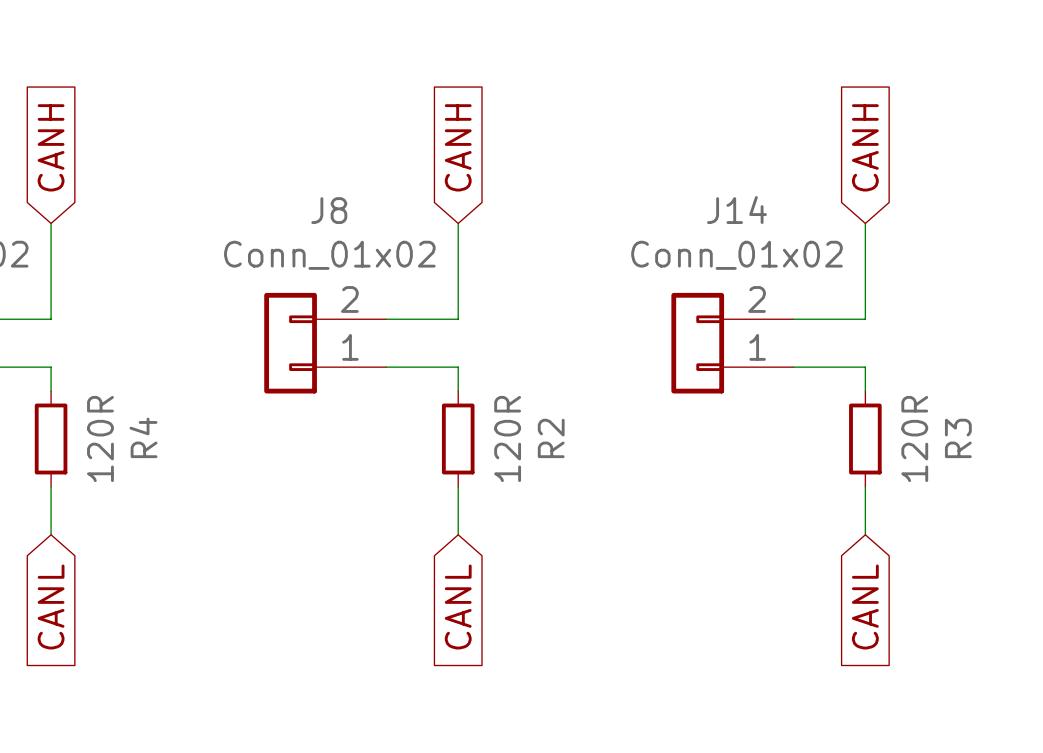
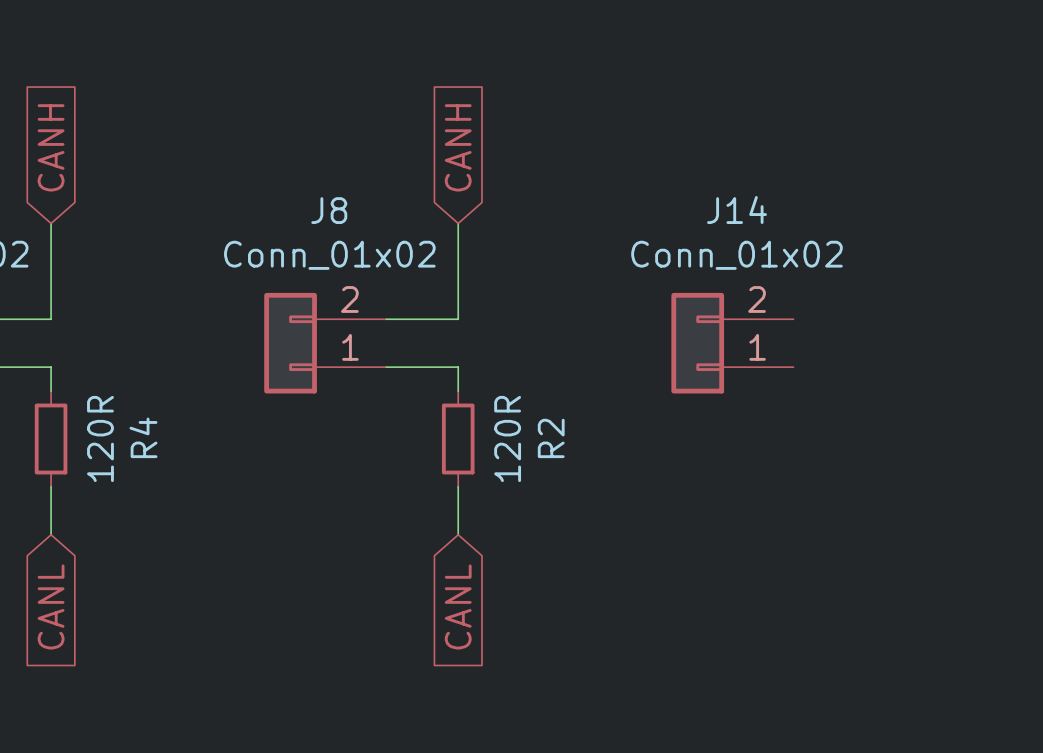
global label: CANH (865, 147) -> none
wire: (865, 223) (865, 319) (793, 319) -> none
wire: (793, 367) (865, 367) (865, 391) -> none
R3: 120R (865, 438) -> none
wire: (865, 486) (865, 534) -> none
global label: CANL (865, 606) -> none

